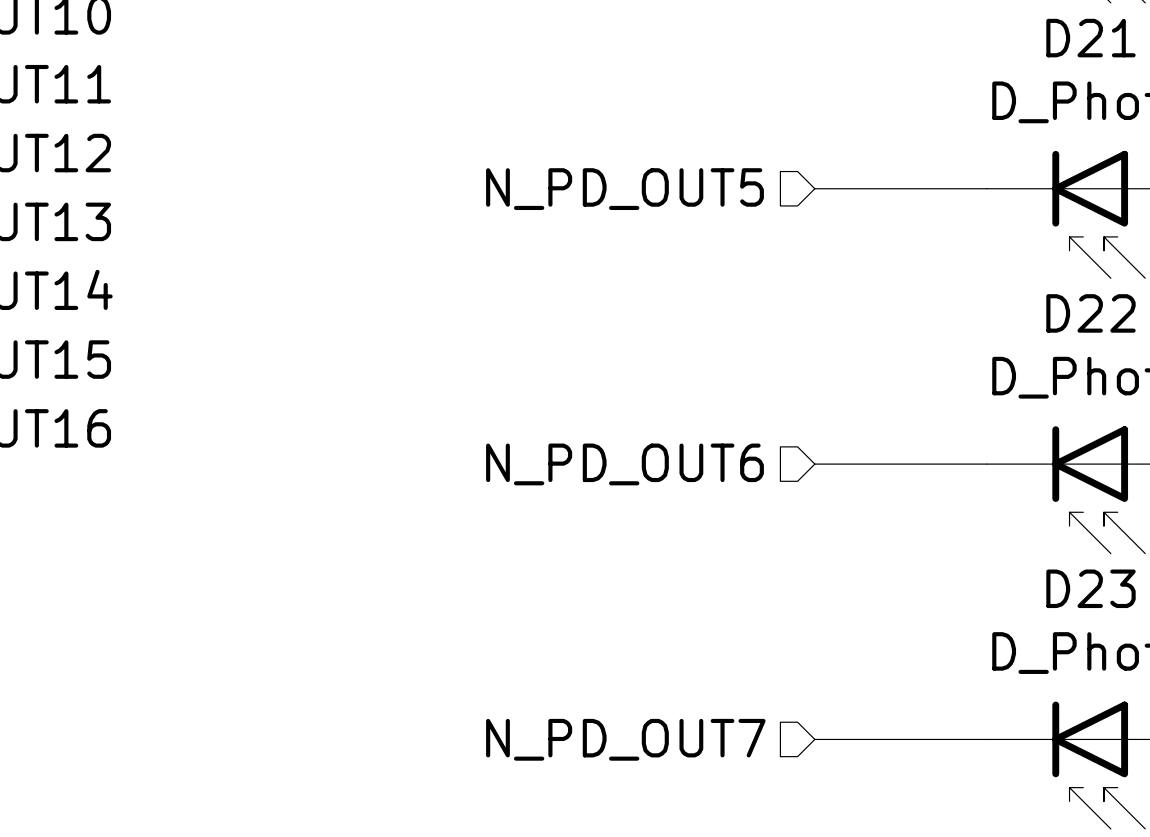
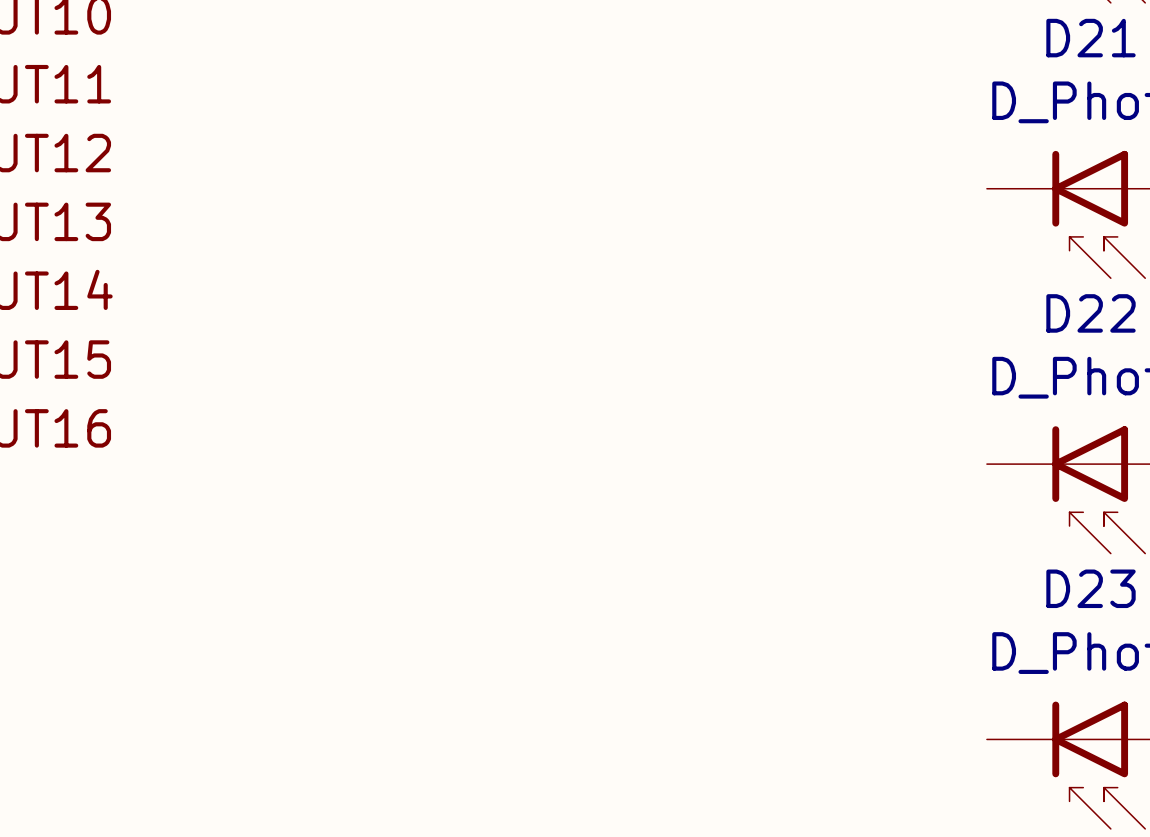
wire: (814, 188) (986, 188) -> none
hierarchical label: N_PD_OUT5 (625, 189) -> none
hierarchical label: N_PD_OUT6 (625, 464) -> none
wire: (814, 464) (986, 464) -> none
hierarchical label: N_PD_OUT7 (625, 739) -> none
wire: (814, 739) (986, 739) -> none

